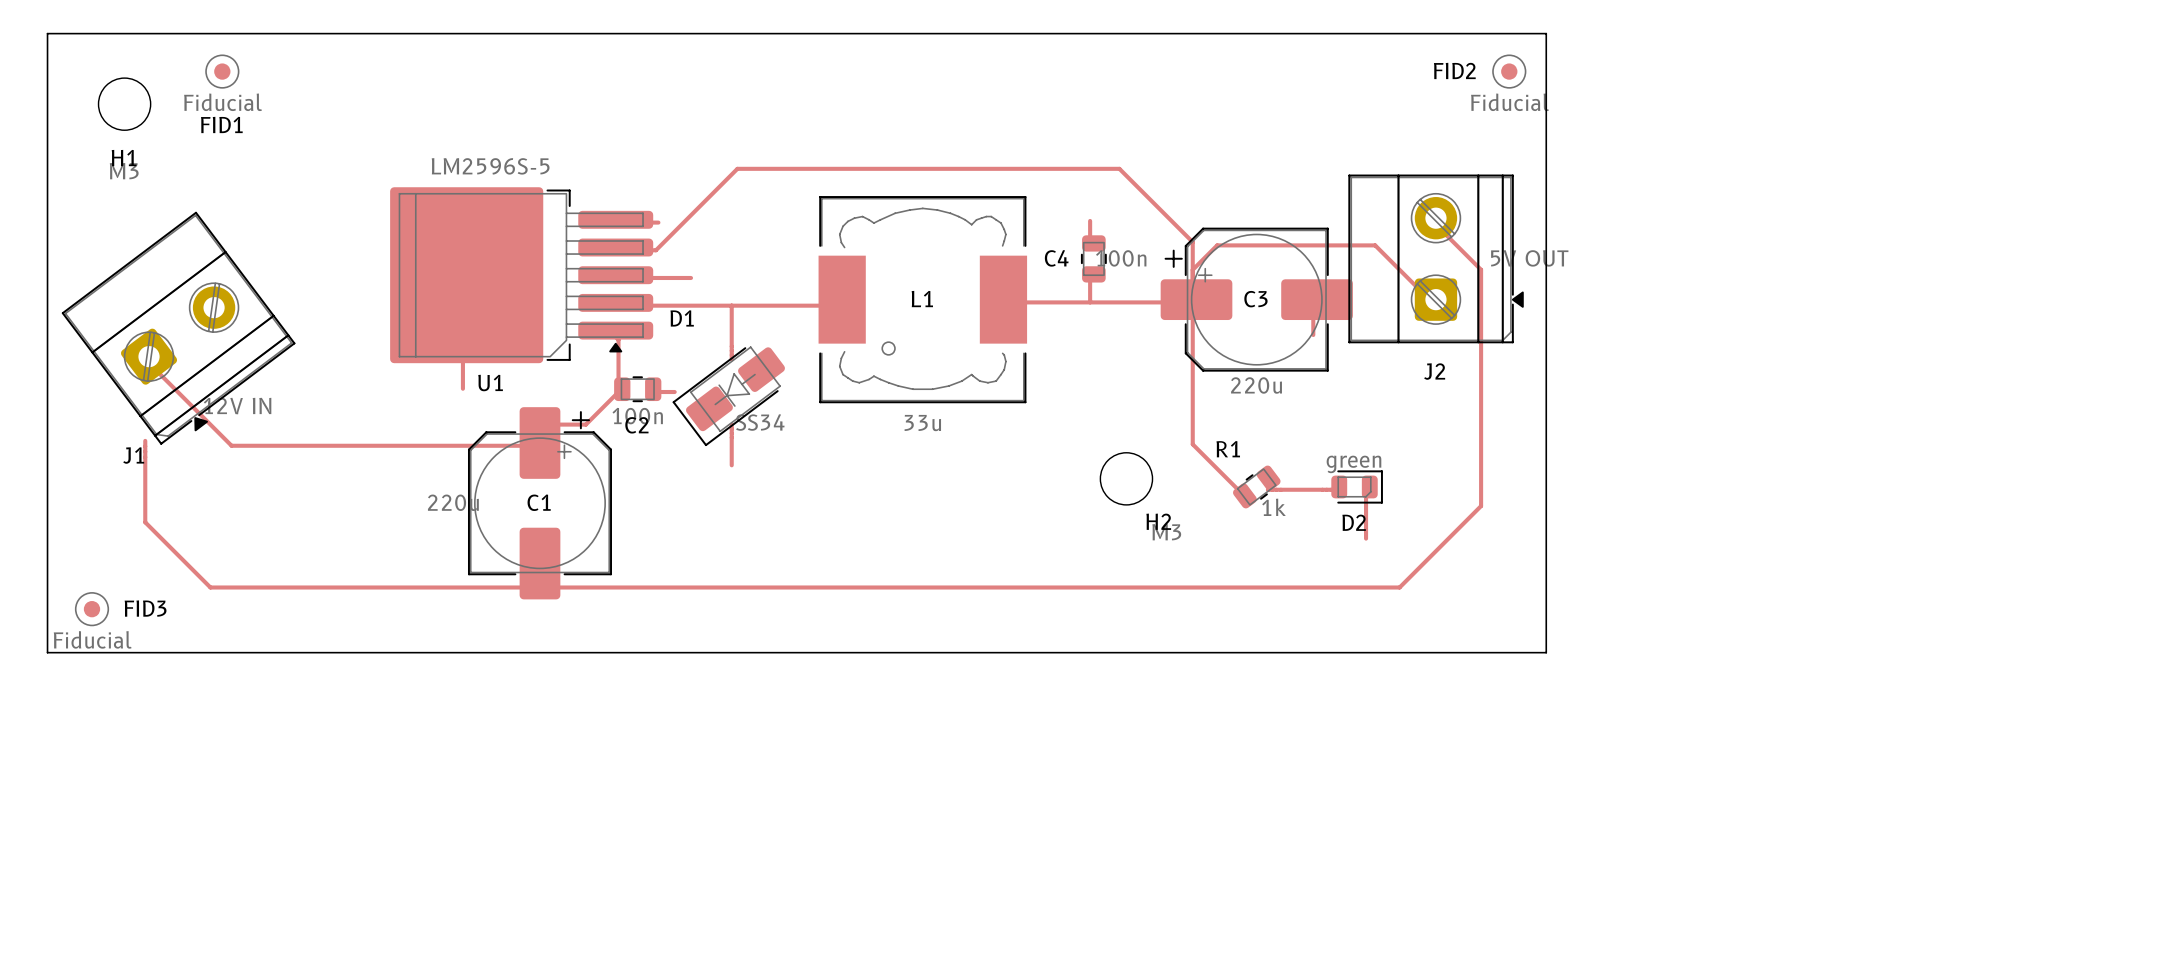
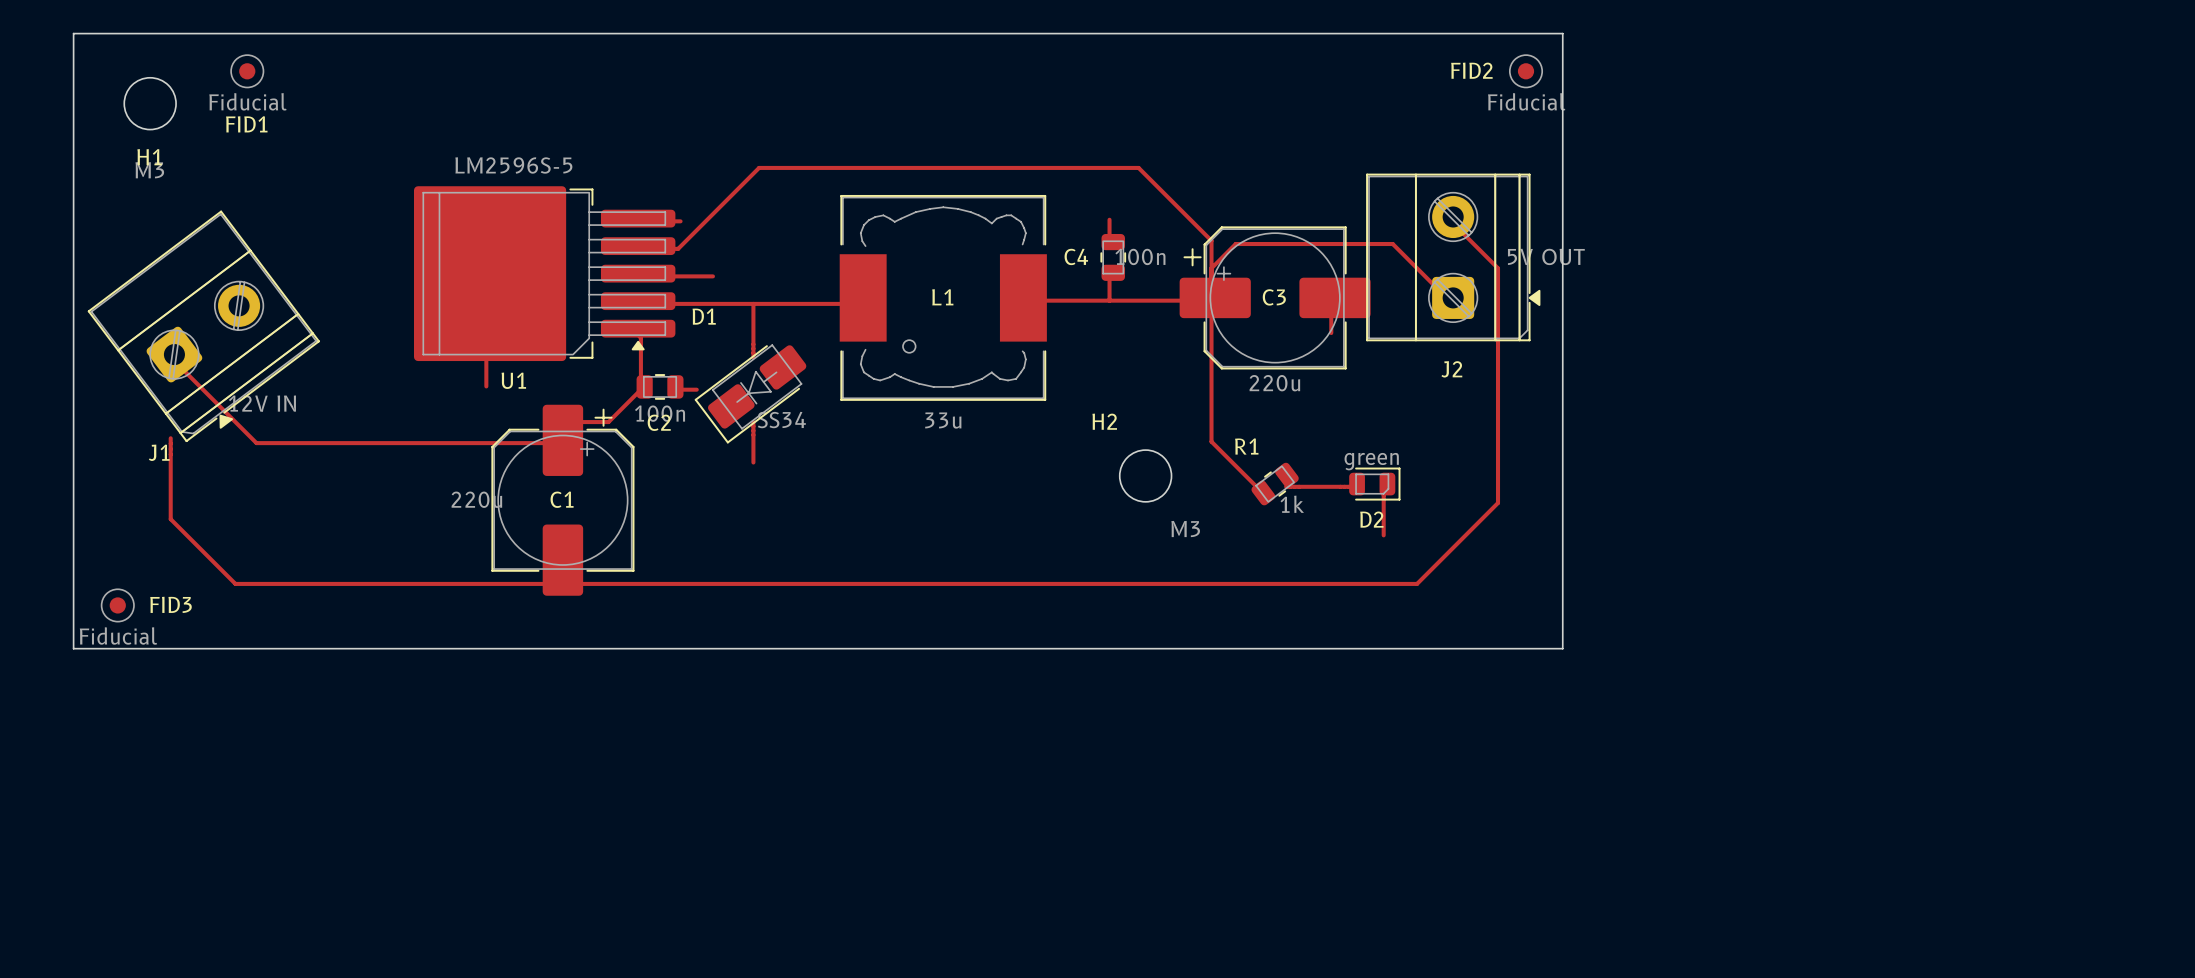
H2 name position: H2 (1158, 521) -> H2 (1104, 421)

